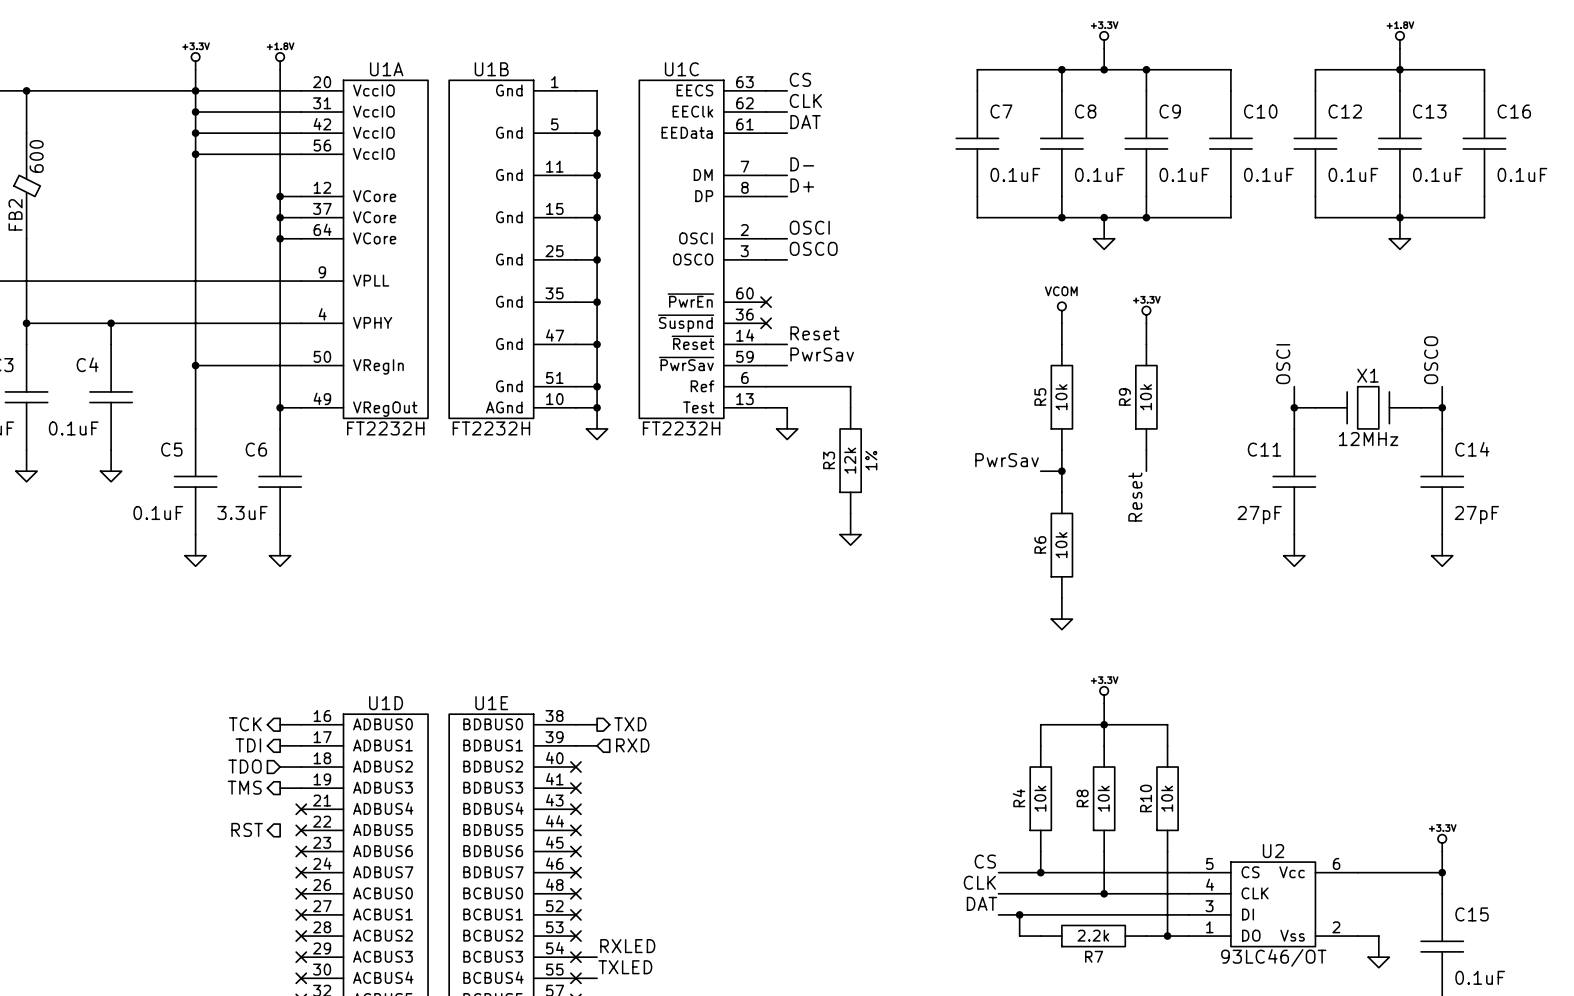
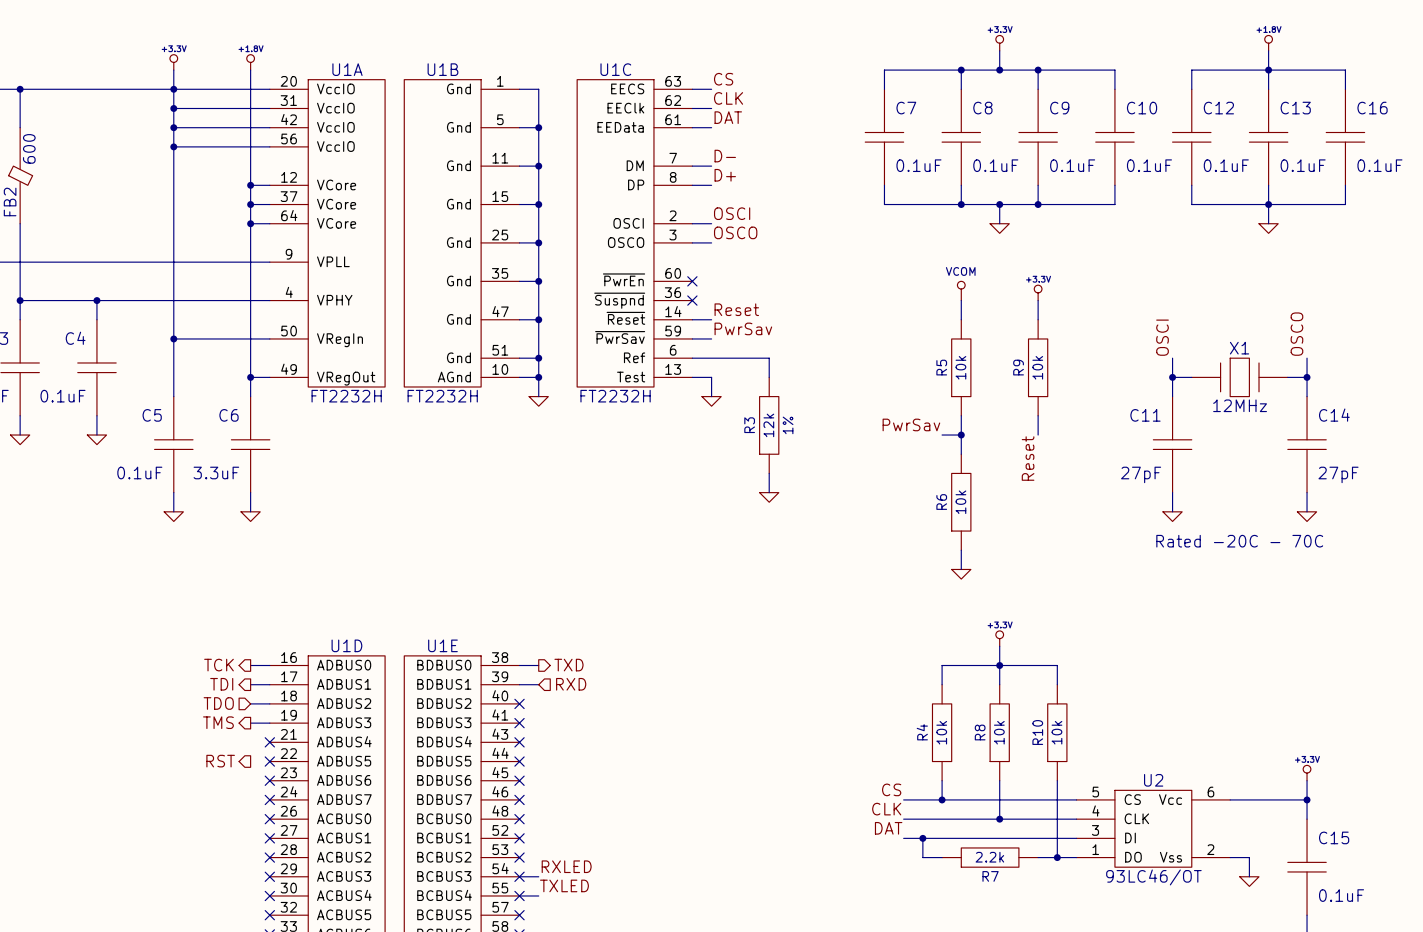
text: none -> Rated -20C - 70C (1239, 541)

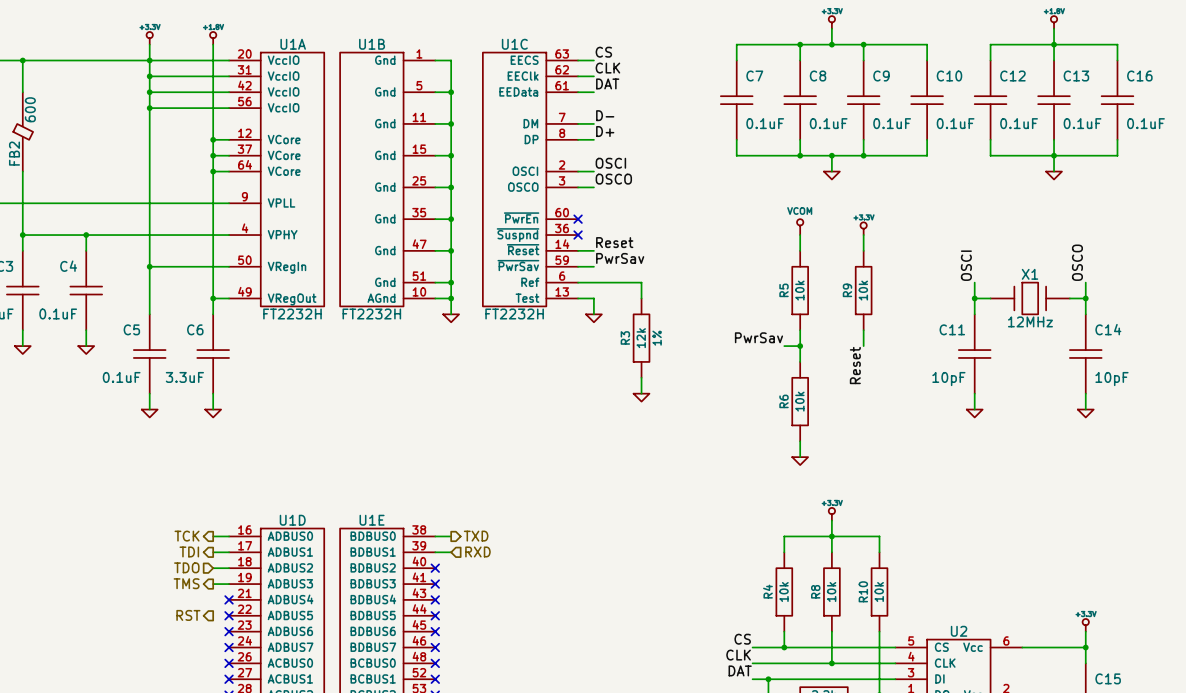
C11 value: 27pF (1141, 474) -> 10pF (948, 379)
C14 value: 27pF (1338, 474) -> 10pF (1111, 379)
text: Rated -20C - 70C (1239, 541) -> none

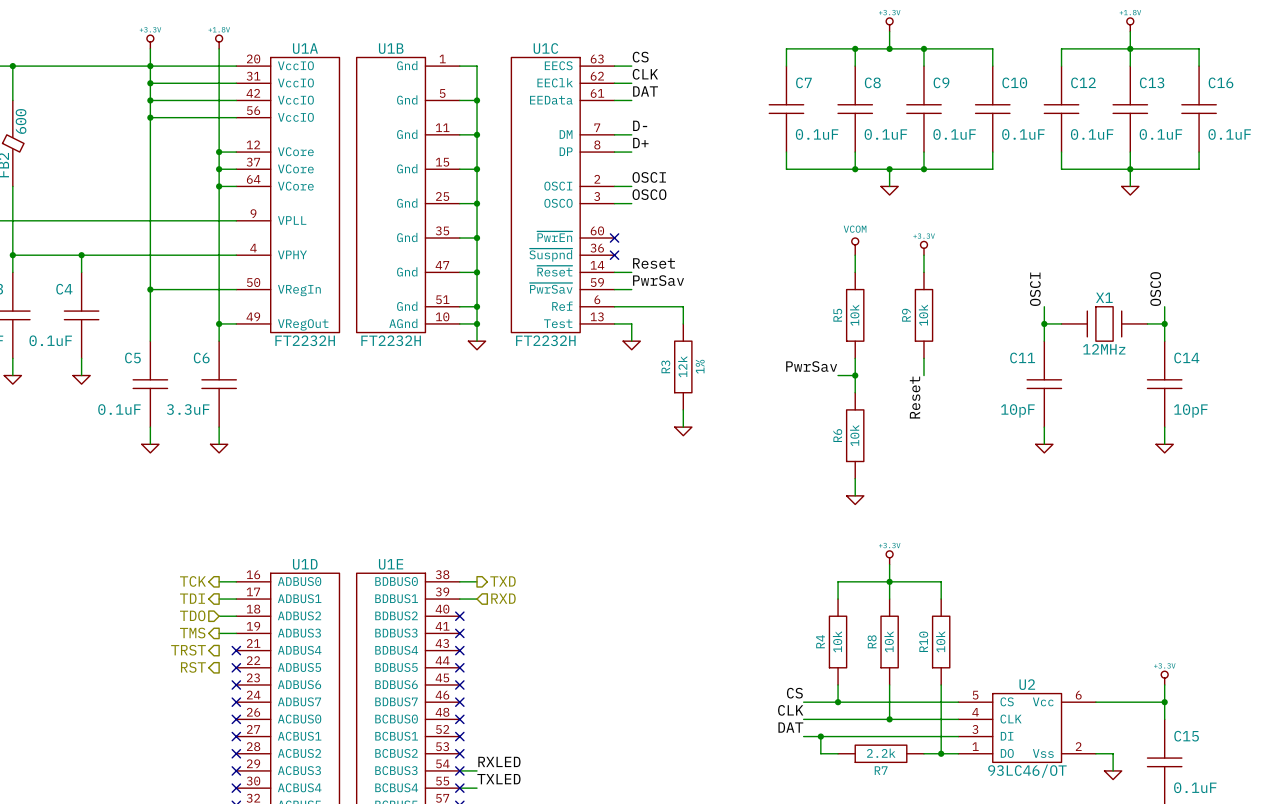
hierarchical label: none -> TRST (188, 650)

